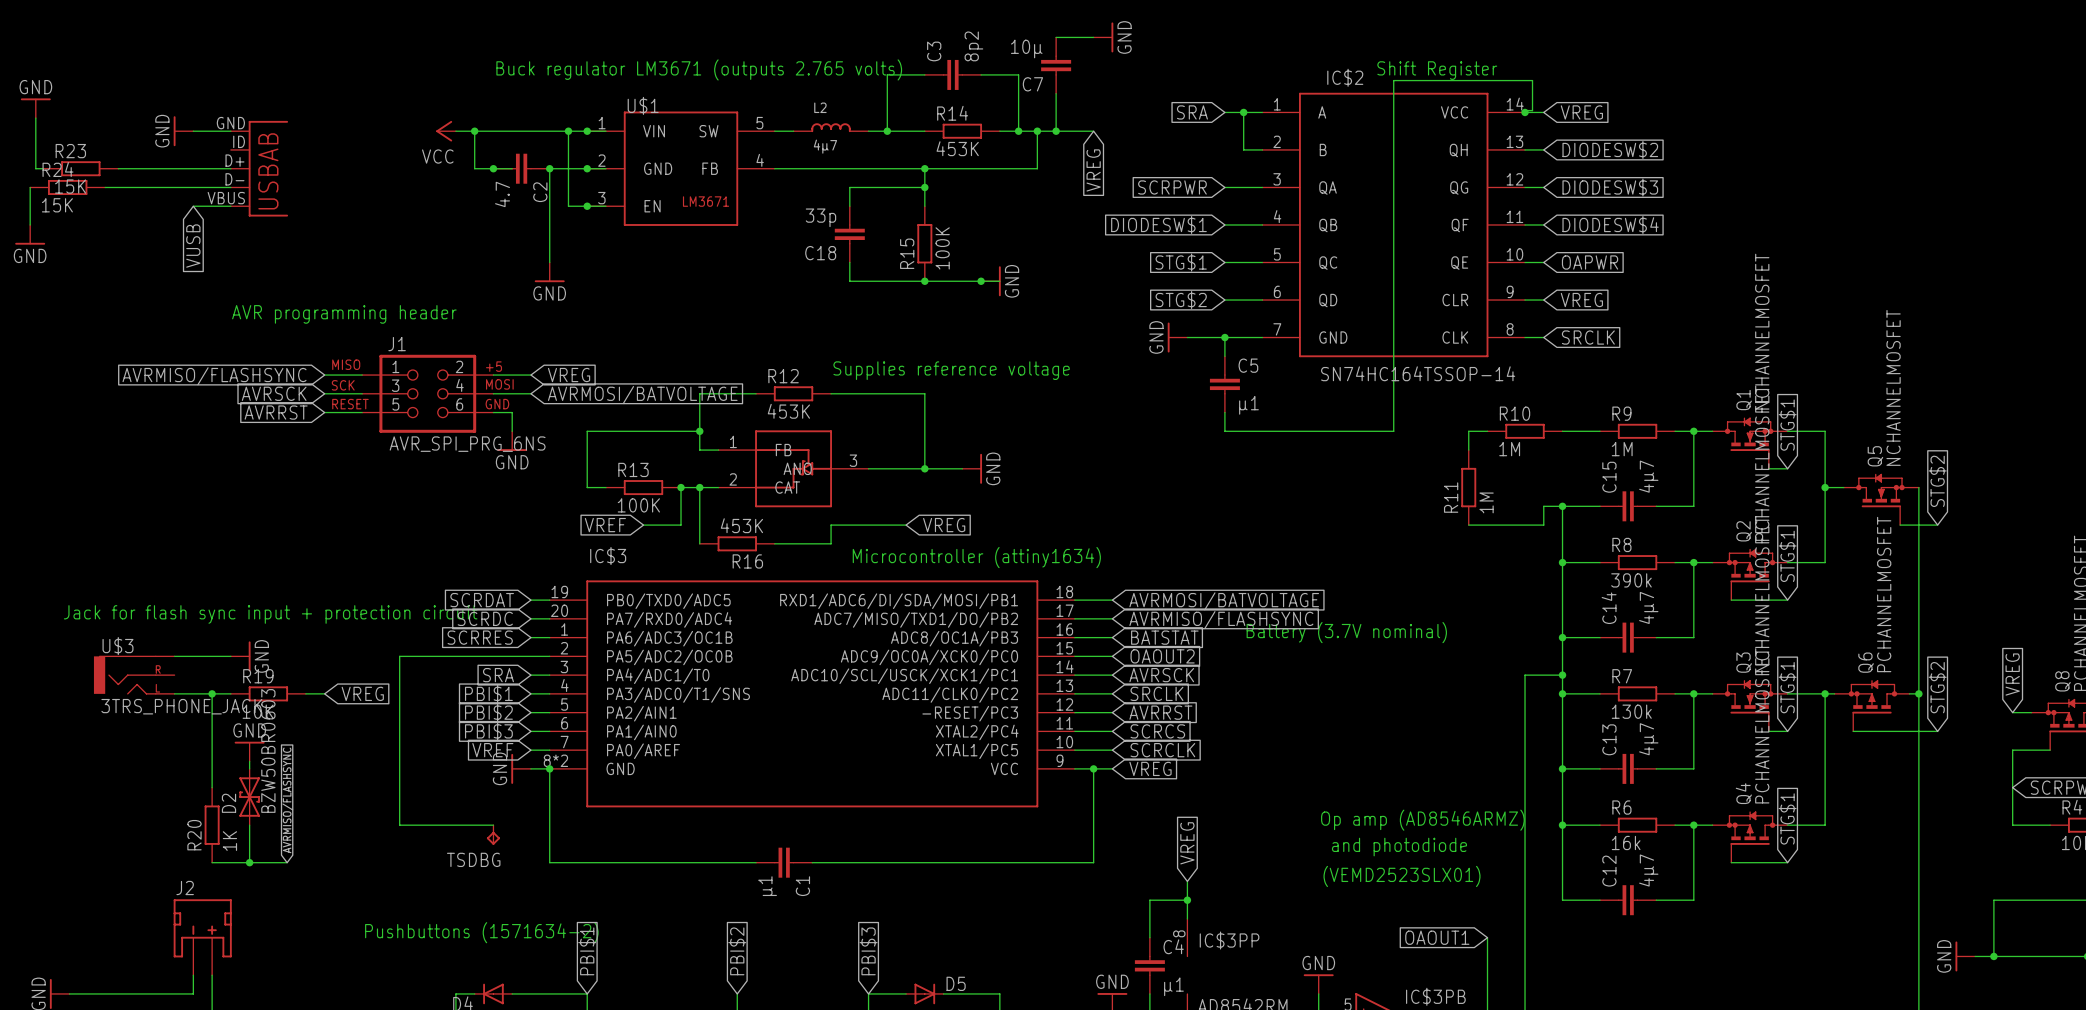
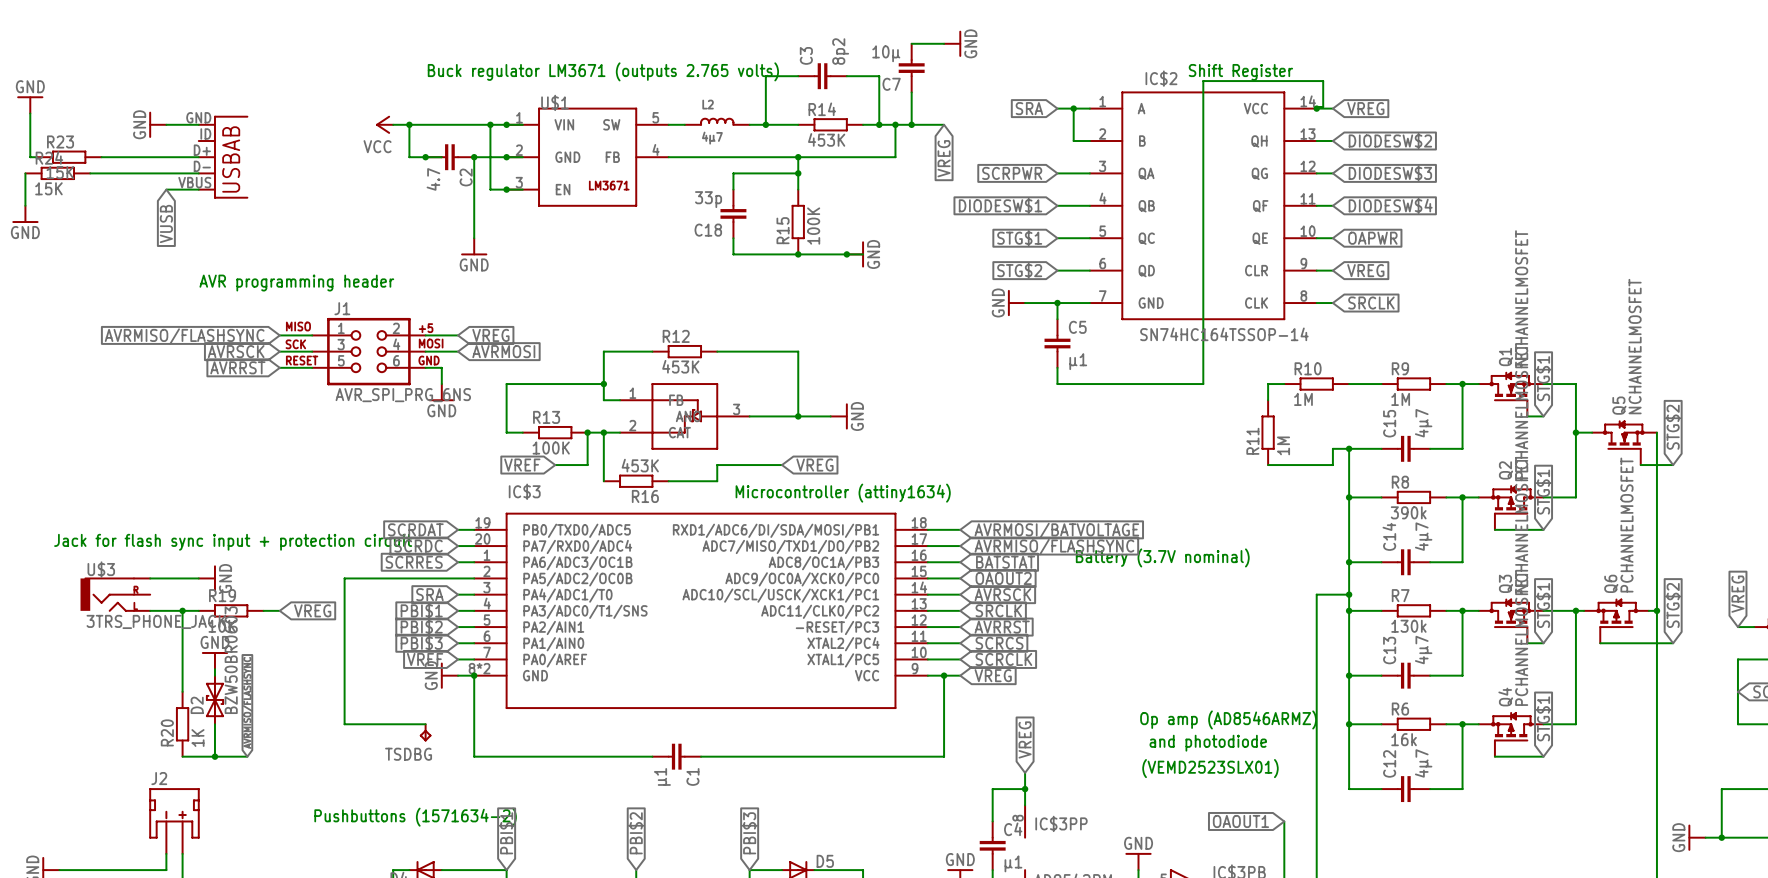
text: Supplies reference voltage (951, 370) -> none
global label: AVRMOSI/BATVOLTAGE (642, 395) -> AVRMOSI (503, 351)

